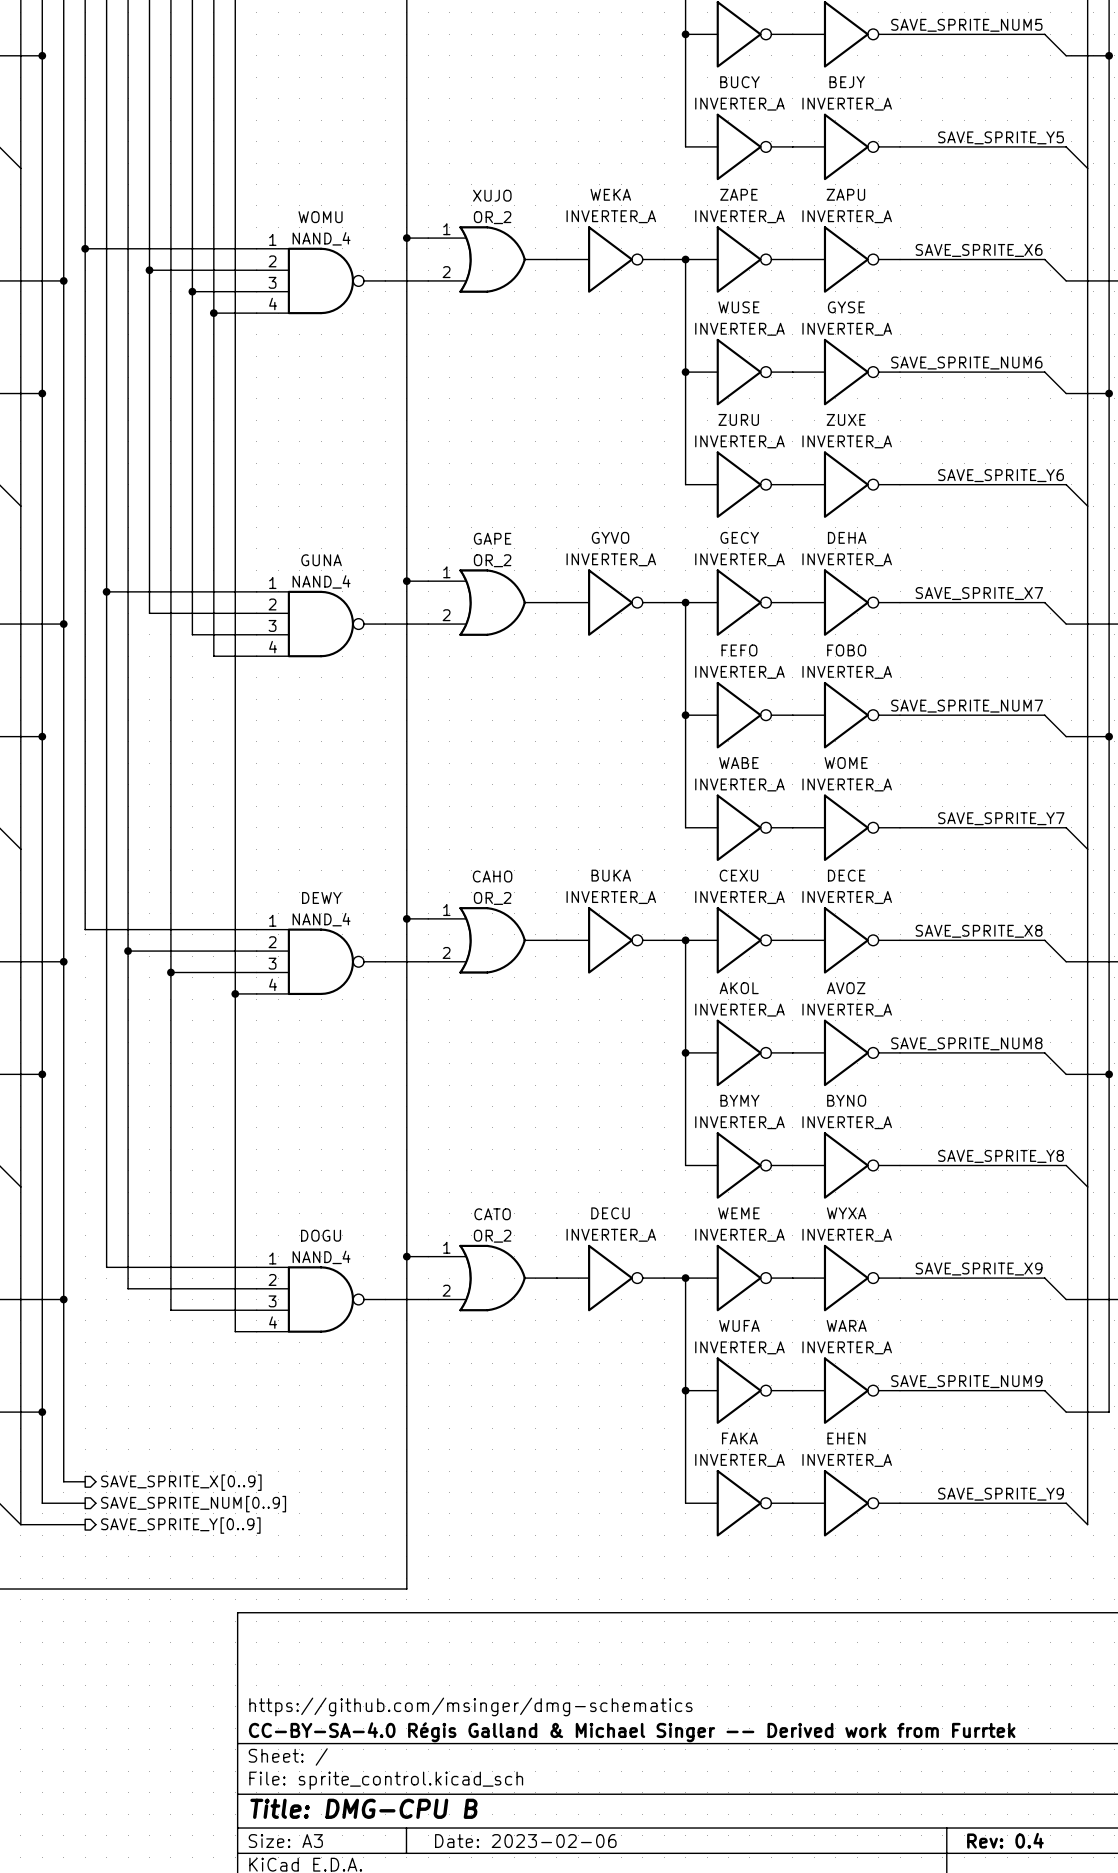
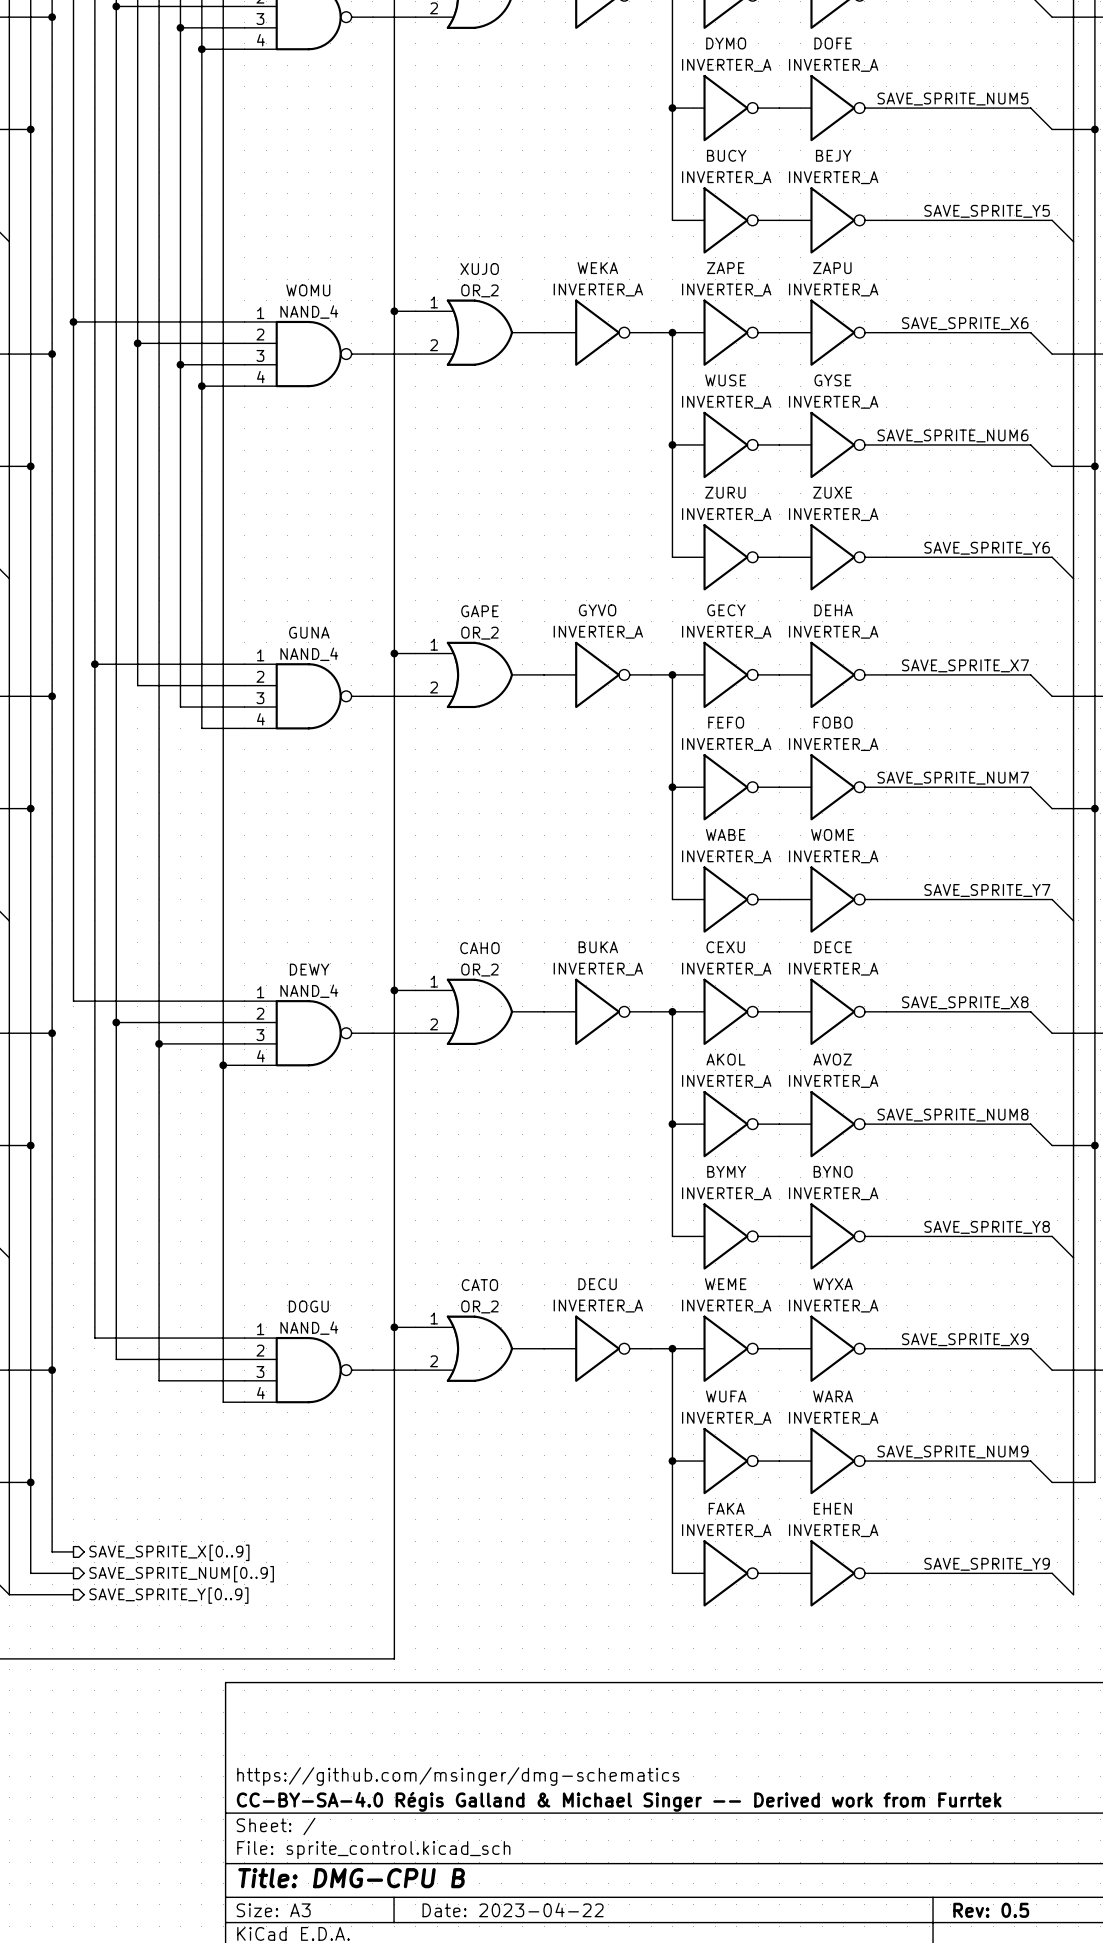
title block: Rev: 0.4 (1005, 1840) -> Rev: 0.5 (991, 1910)
title block: Date: 2023-02-06 (525, 1841) -> Date: 2023-04-22 (513, 1910)

